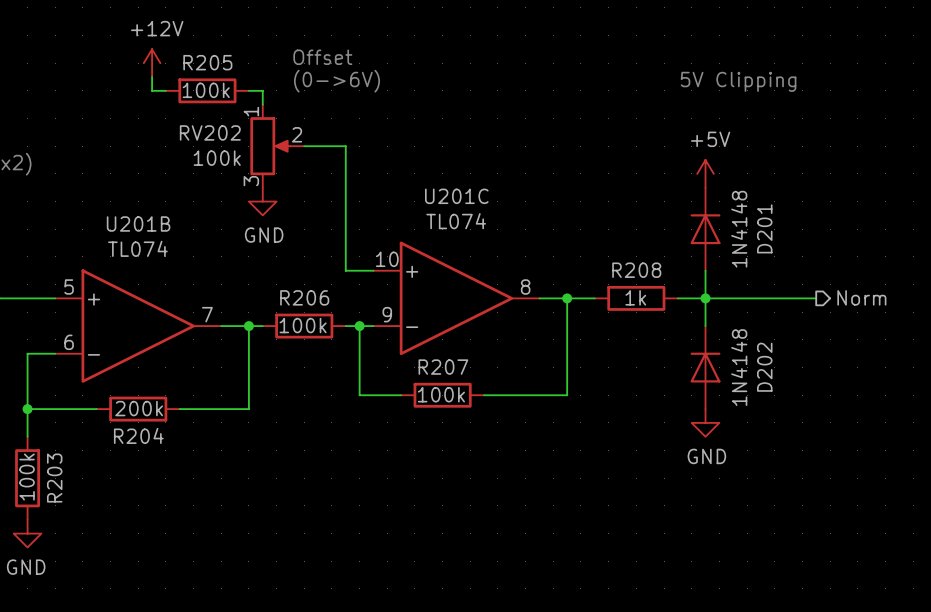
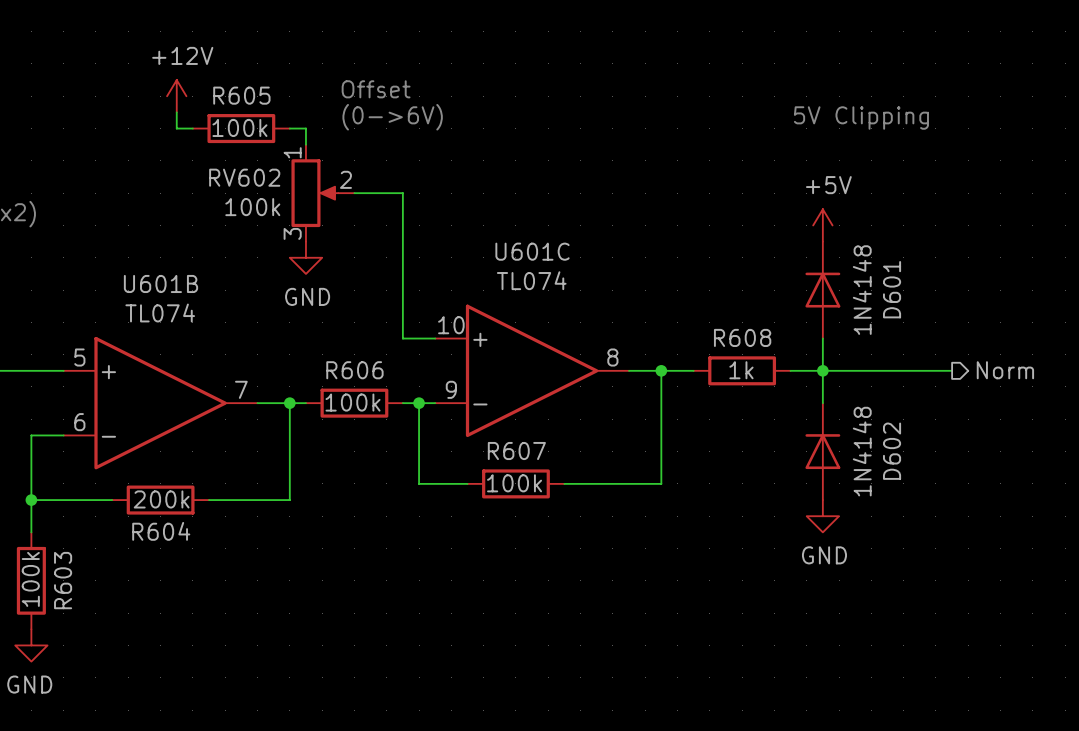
R205 name: R205 (207, 62) -> R605 (241, 95)
RV202 name: RV202 (210, 132) -> RV602 (244, 177)
U201C name: U201C (456, 196) -> U601C (532, 251)
U201B name: U201B (138, 224) -> U601B (160, 283)
D201 name: D201 (764, 228) -> D601 (892, 289)
R208 name: R208 (636, 270) -> R608 (742, 337)
R206 name: R206 (304, 297) -> R606 (354, 370)
R207 name: R207 (443, 367) -> R607 (516, 451)
D202 name: D202 (764, 367) -> D602 (892, 451)
R204 name: R204 (138, 435) -> R604 (161, 531)
R203 name: R203 (54, 478) -> R603 (63, 580)

